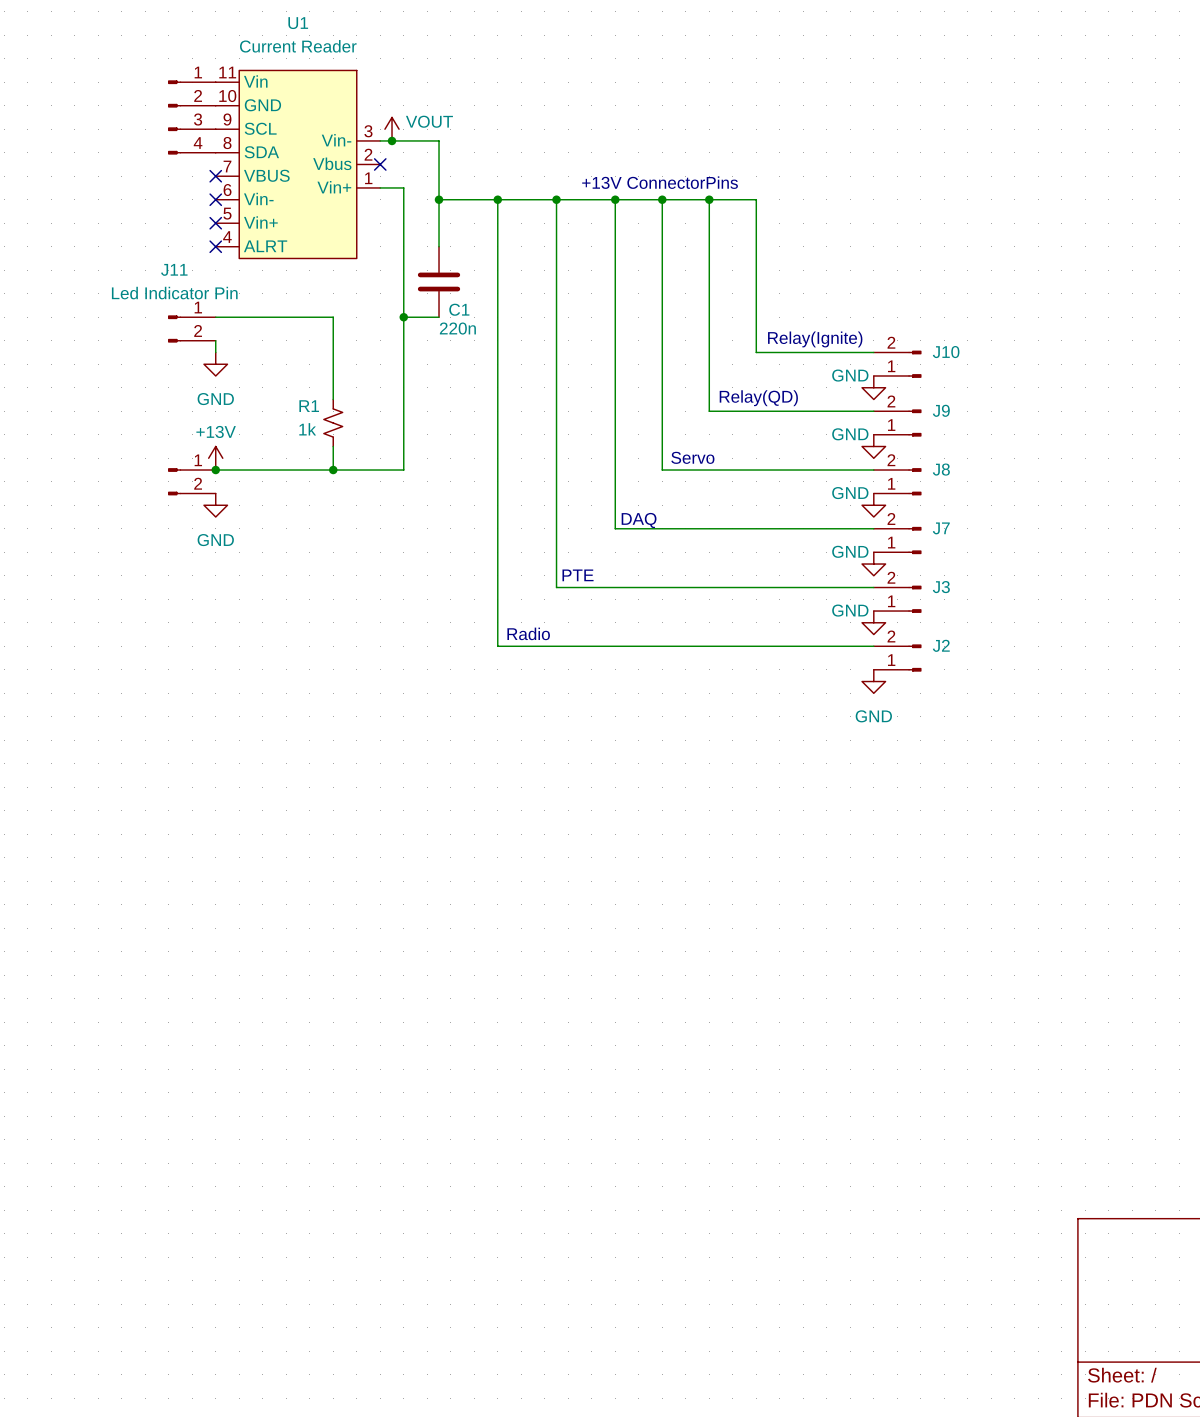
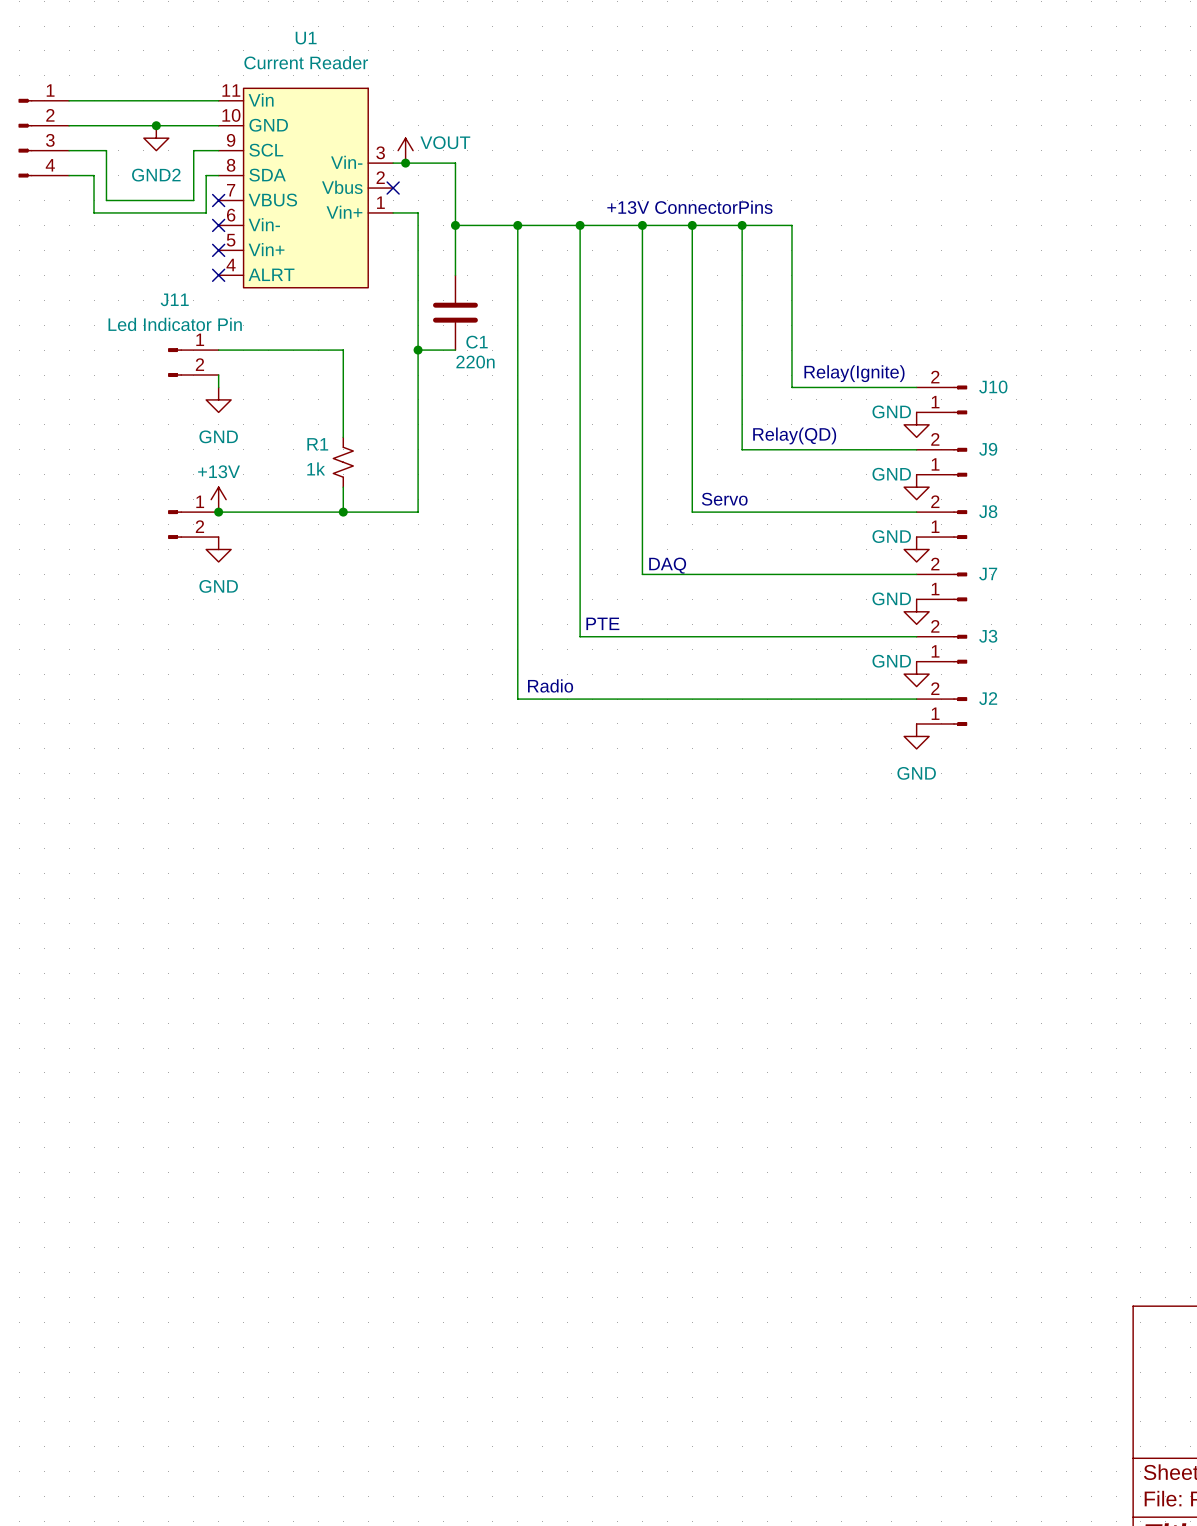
wire: none -> (69, 100) (218, 100)
wire: none -> (69, 125) (218, 125)
junction: none -> (156, 125)
power symbol: none -> GND2 (156, 138)
part position: (191, 117) -> (43, 138)
wire: none -> (69, 150) (106, 150) (106, 200) (193, 200) (193, 150) (218, 150)
wire: none -> (69, 175) (94, 175) (94, 212) (206, 212) (206, 175) (218, 175)

